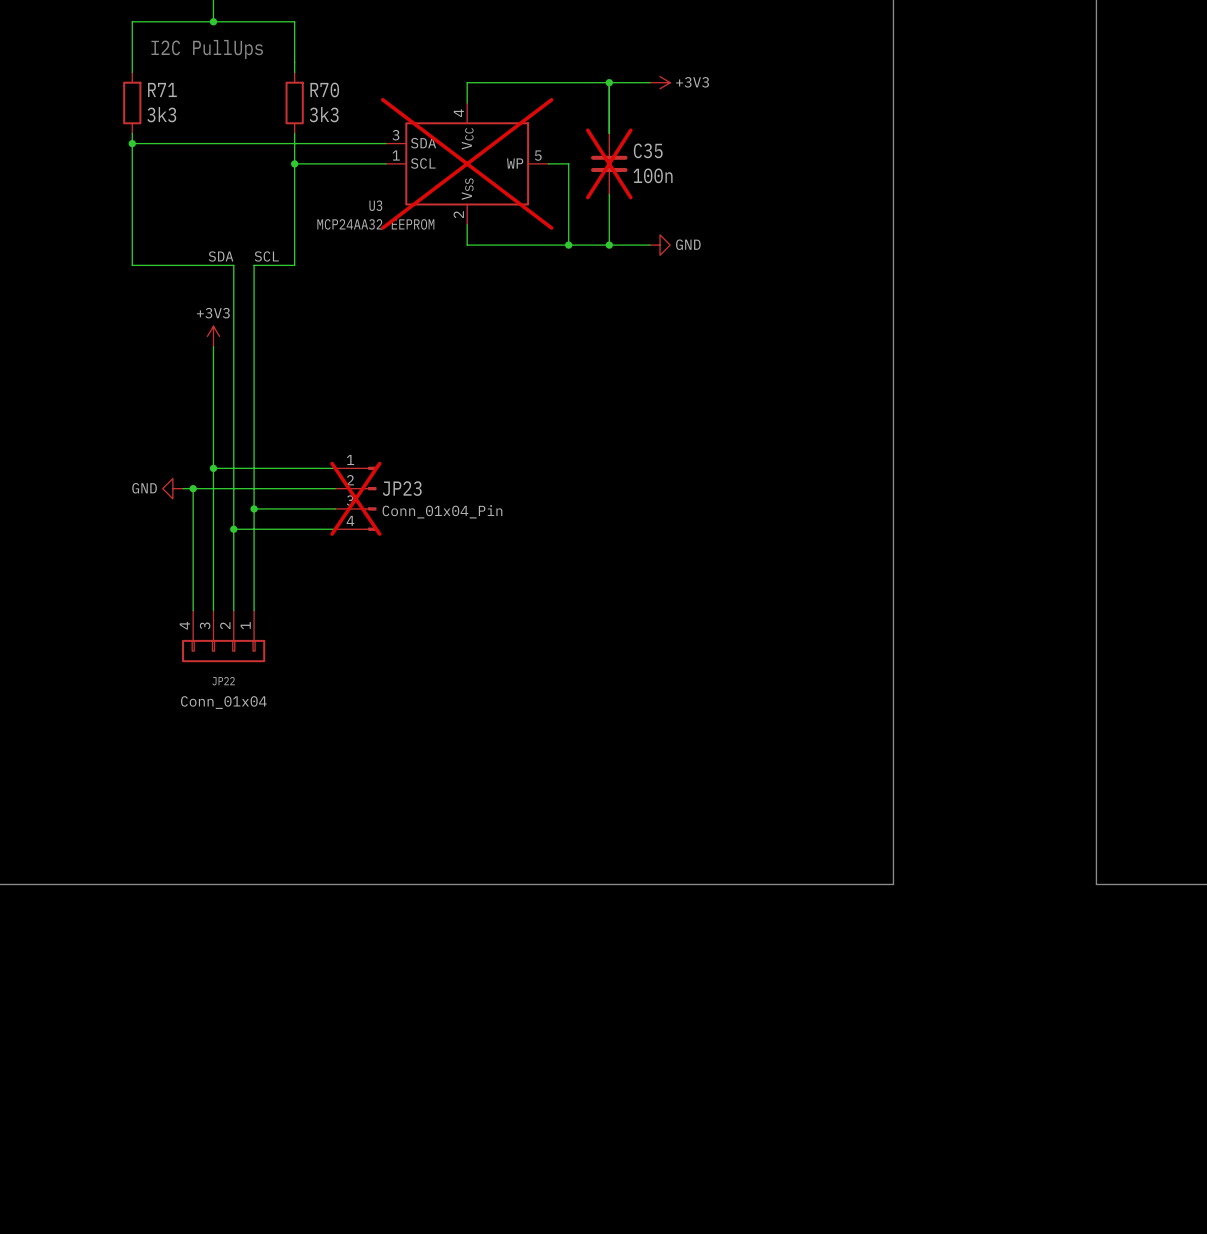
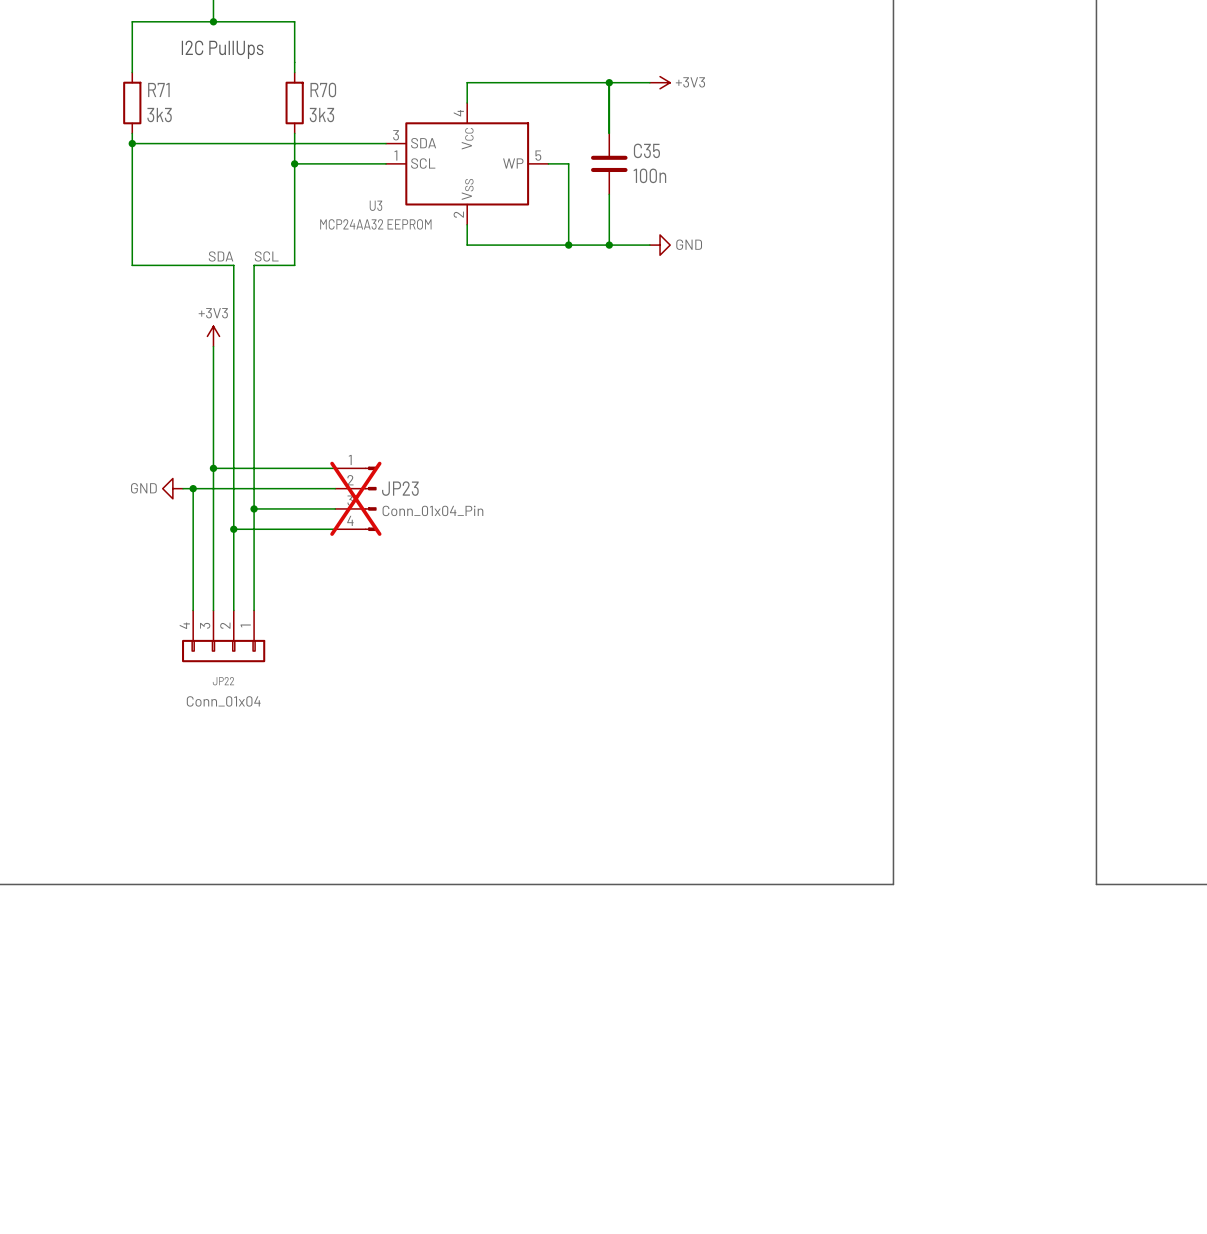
U3 do-not-place cross: (467, 163) -> none
C35 do-not-place cross: (609, 163) -> none

